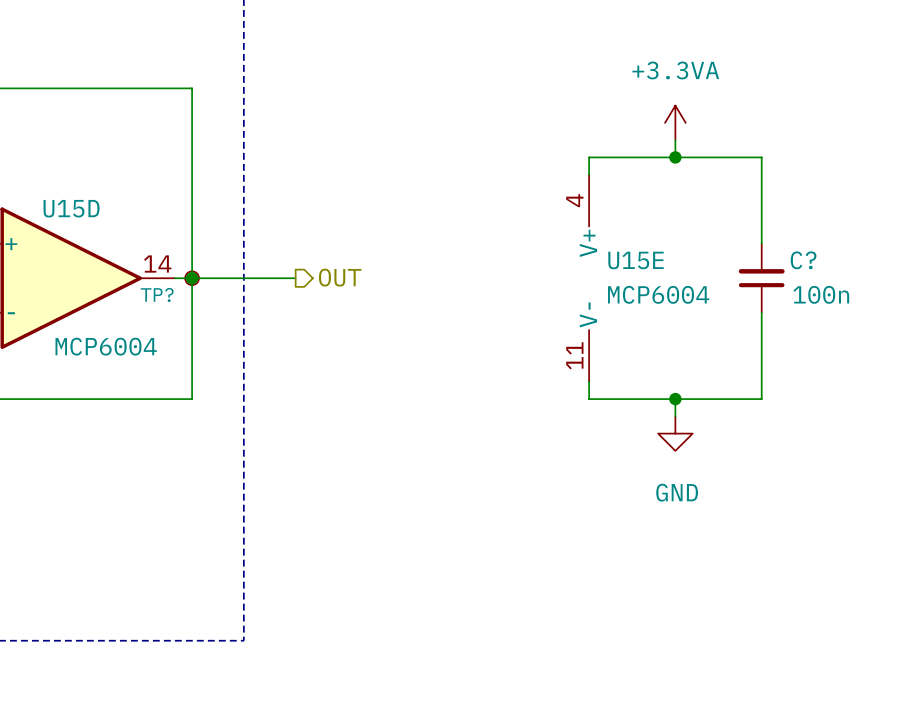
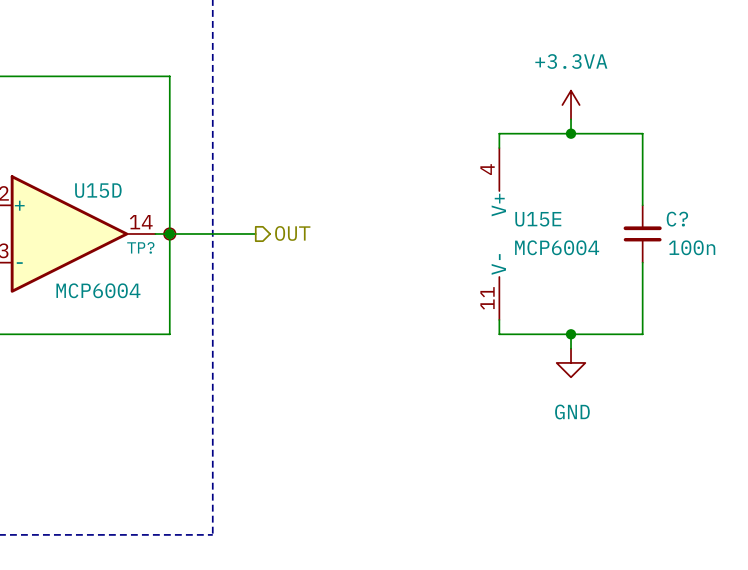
U15D name position: U15D (71, 208) -> U15D (98, 190)

